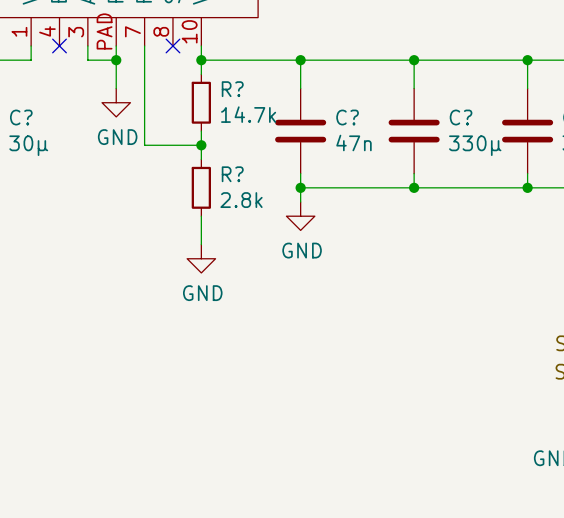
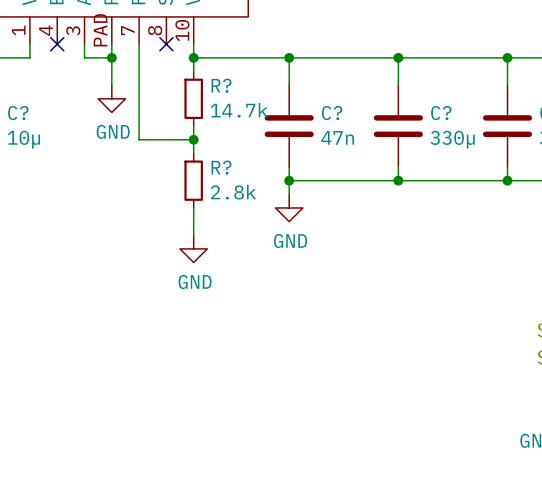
C? value: 30µ (28, 145) -> 10µ (23, 139)

